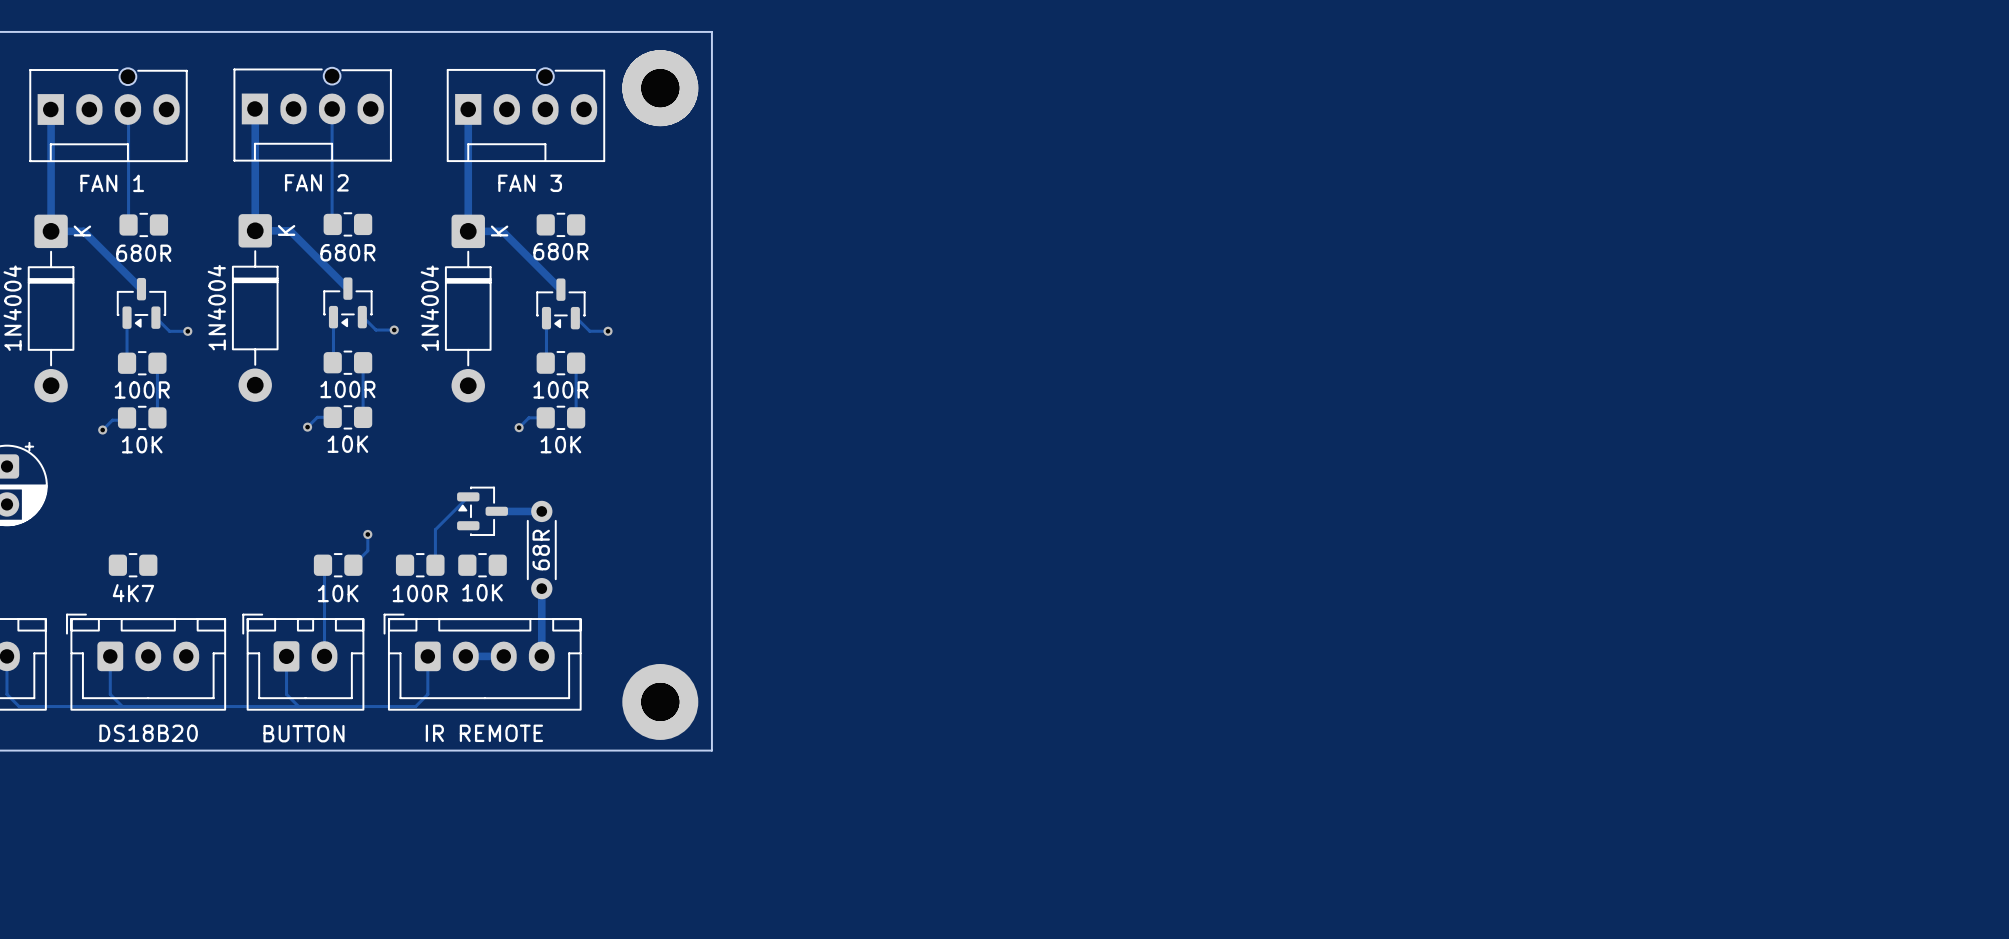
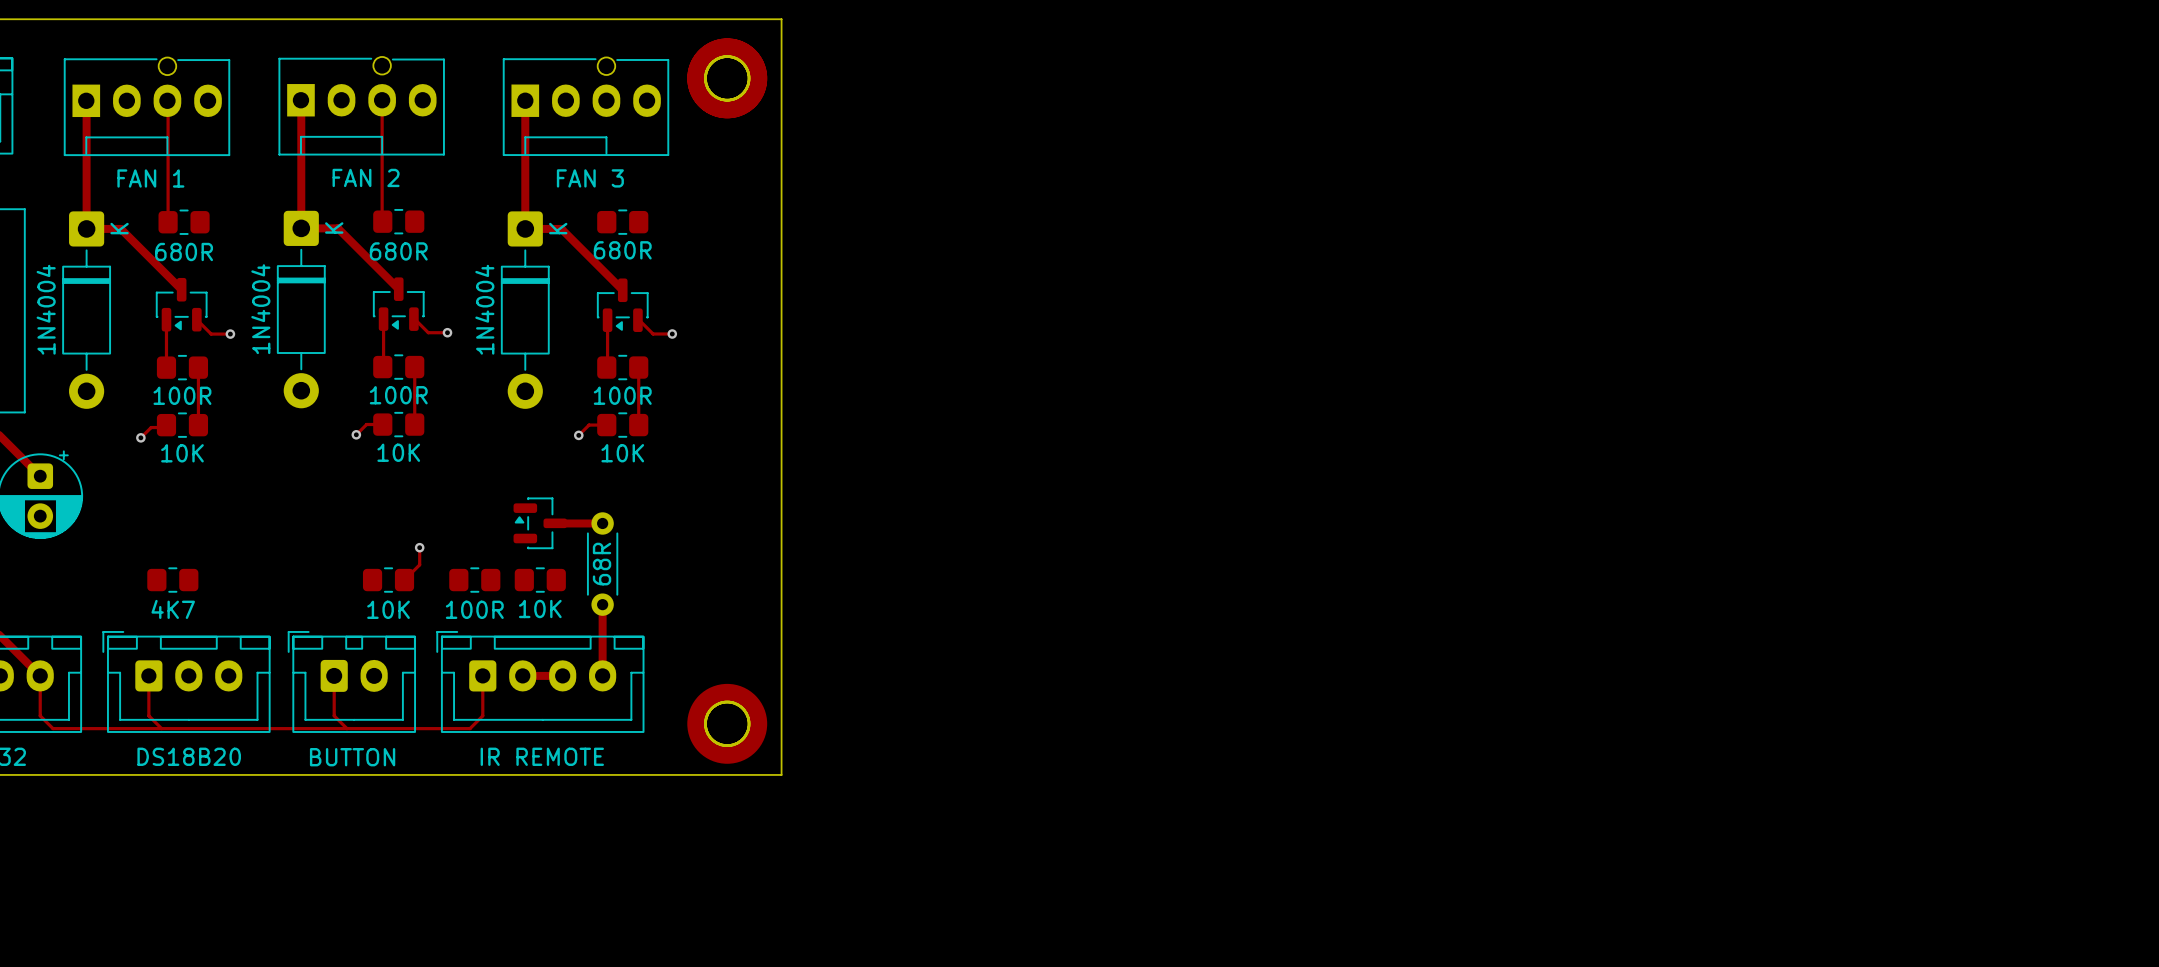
track: (468, 496) (435, 529) (435, 565) -> none
track: (323, 565) (324, 656) -> none

